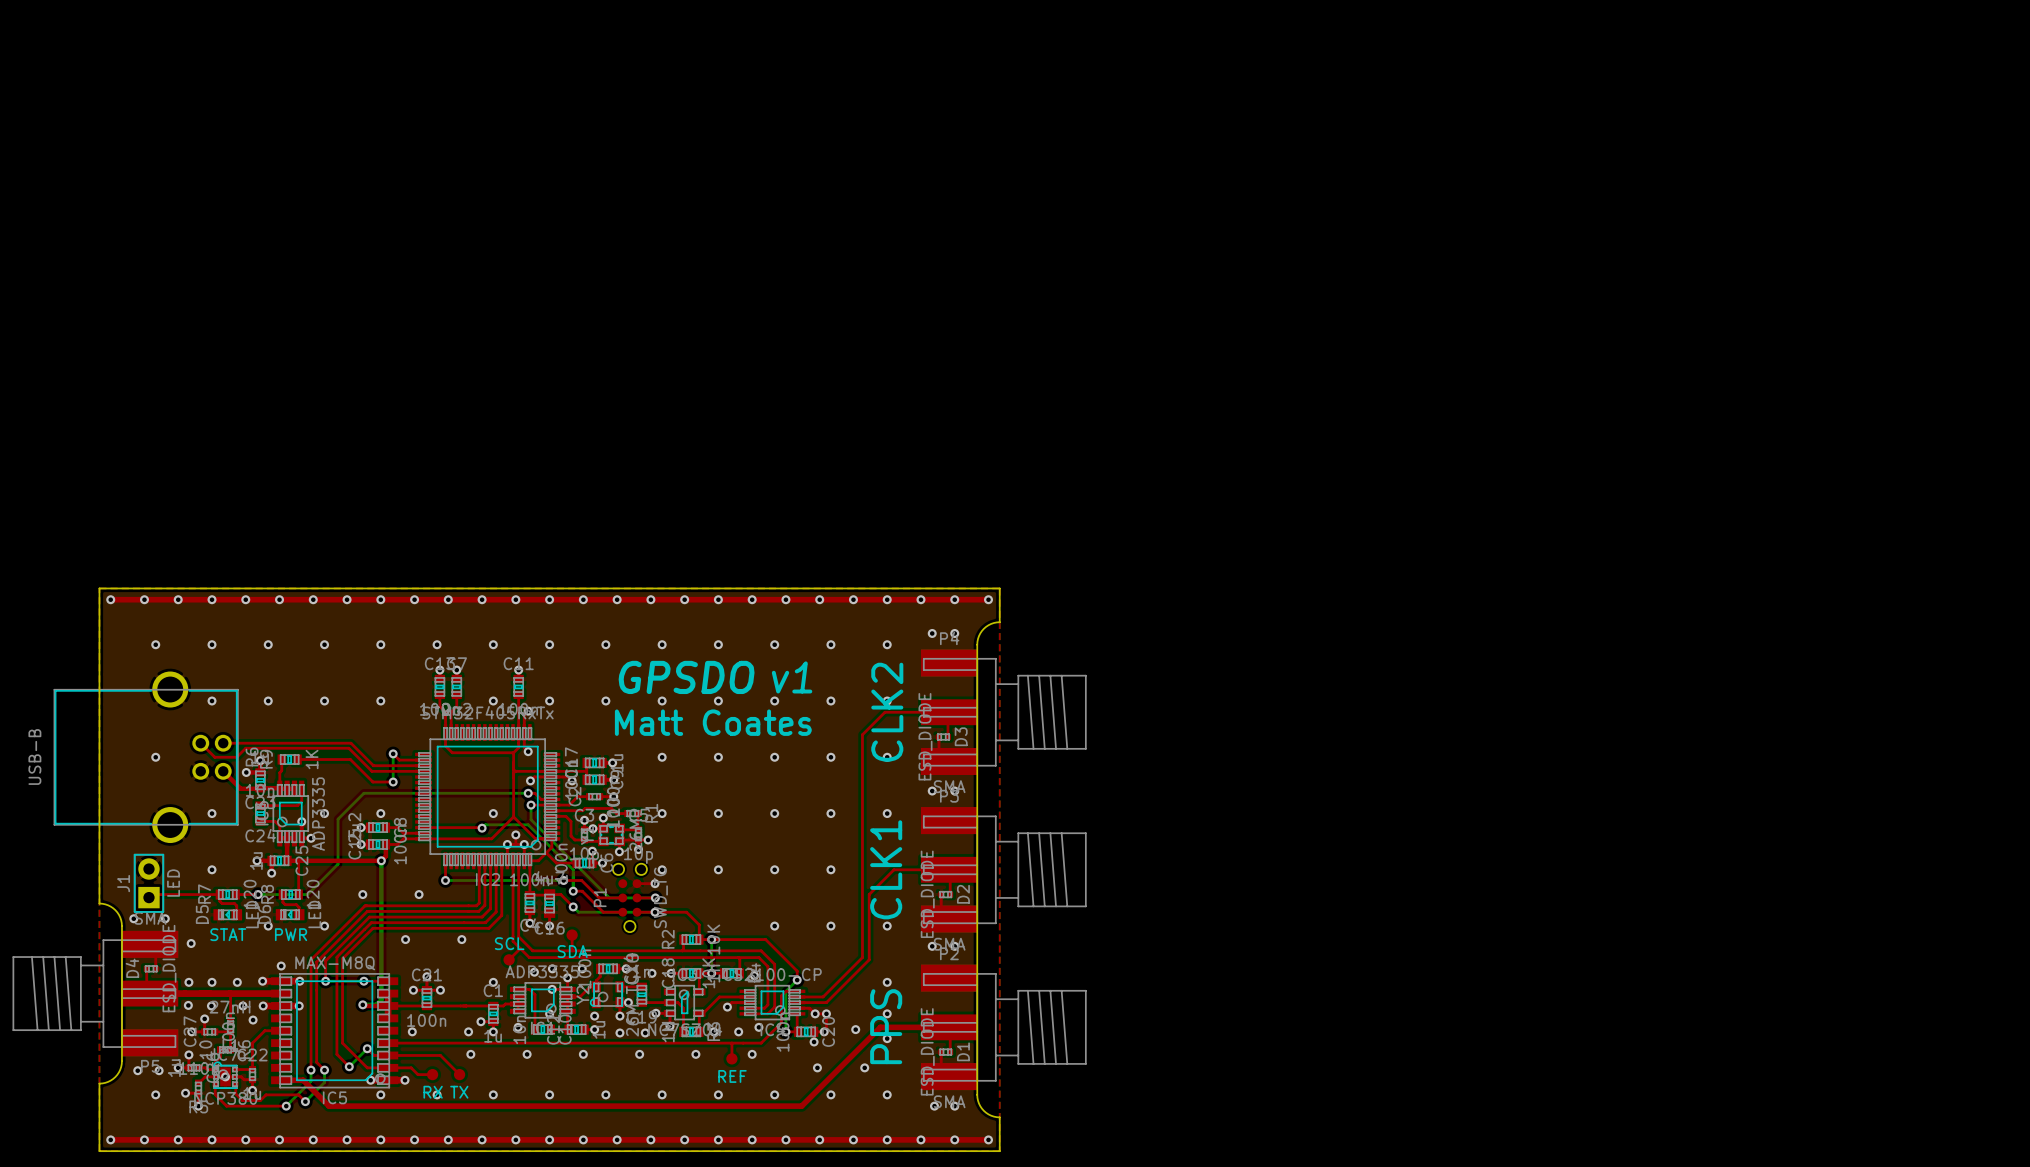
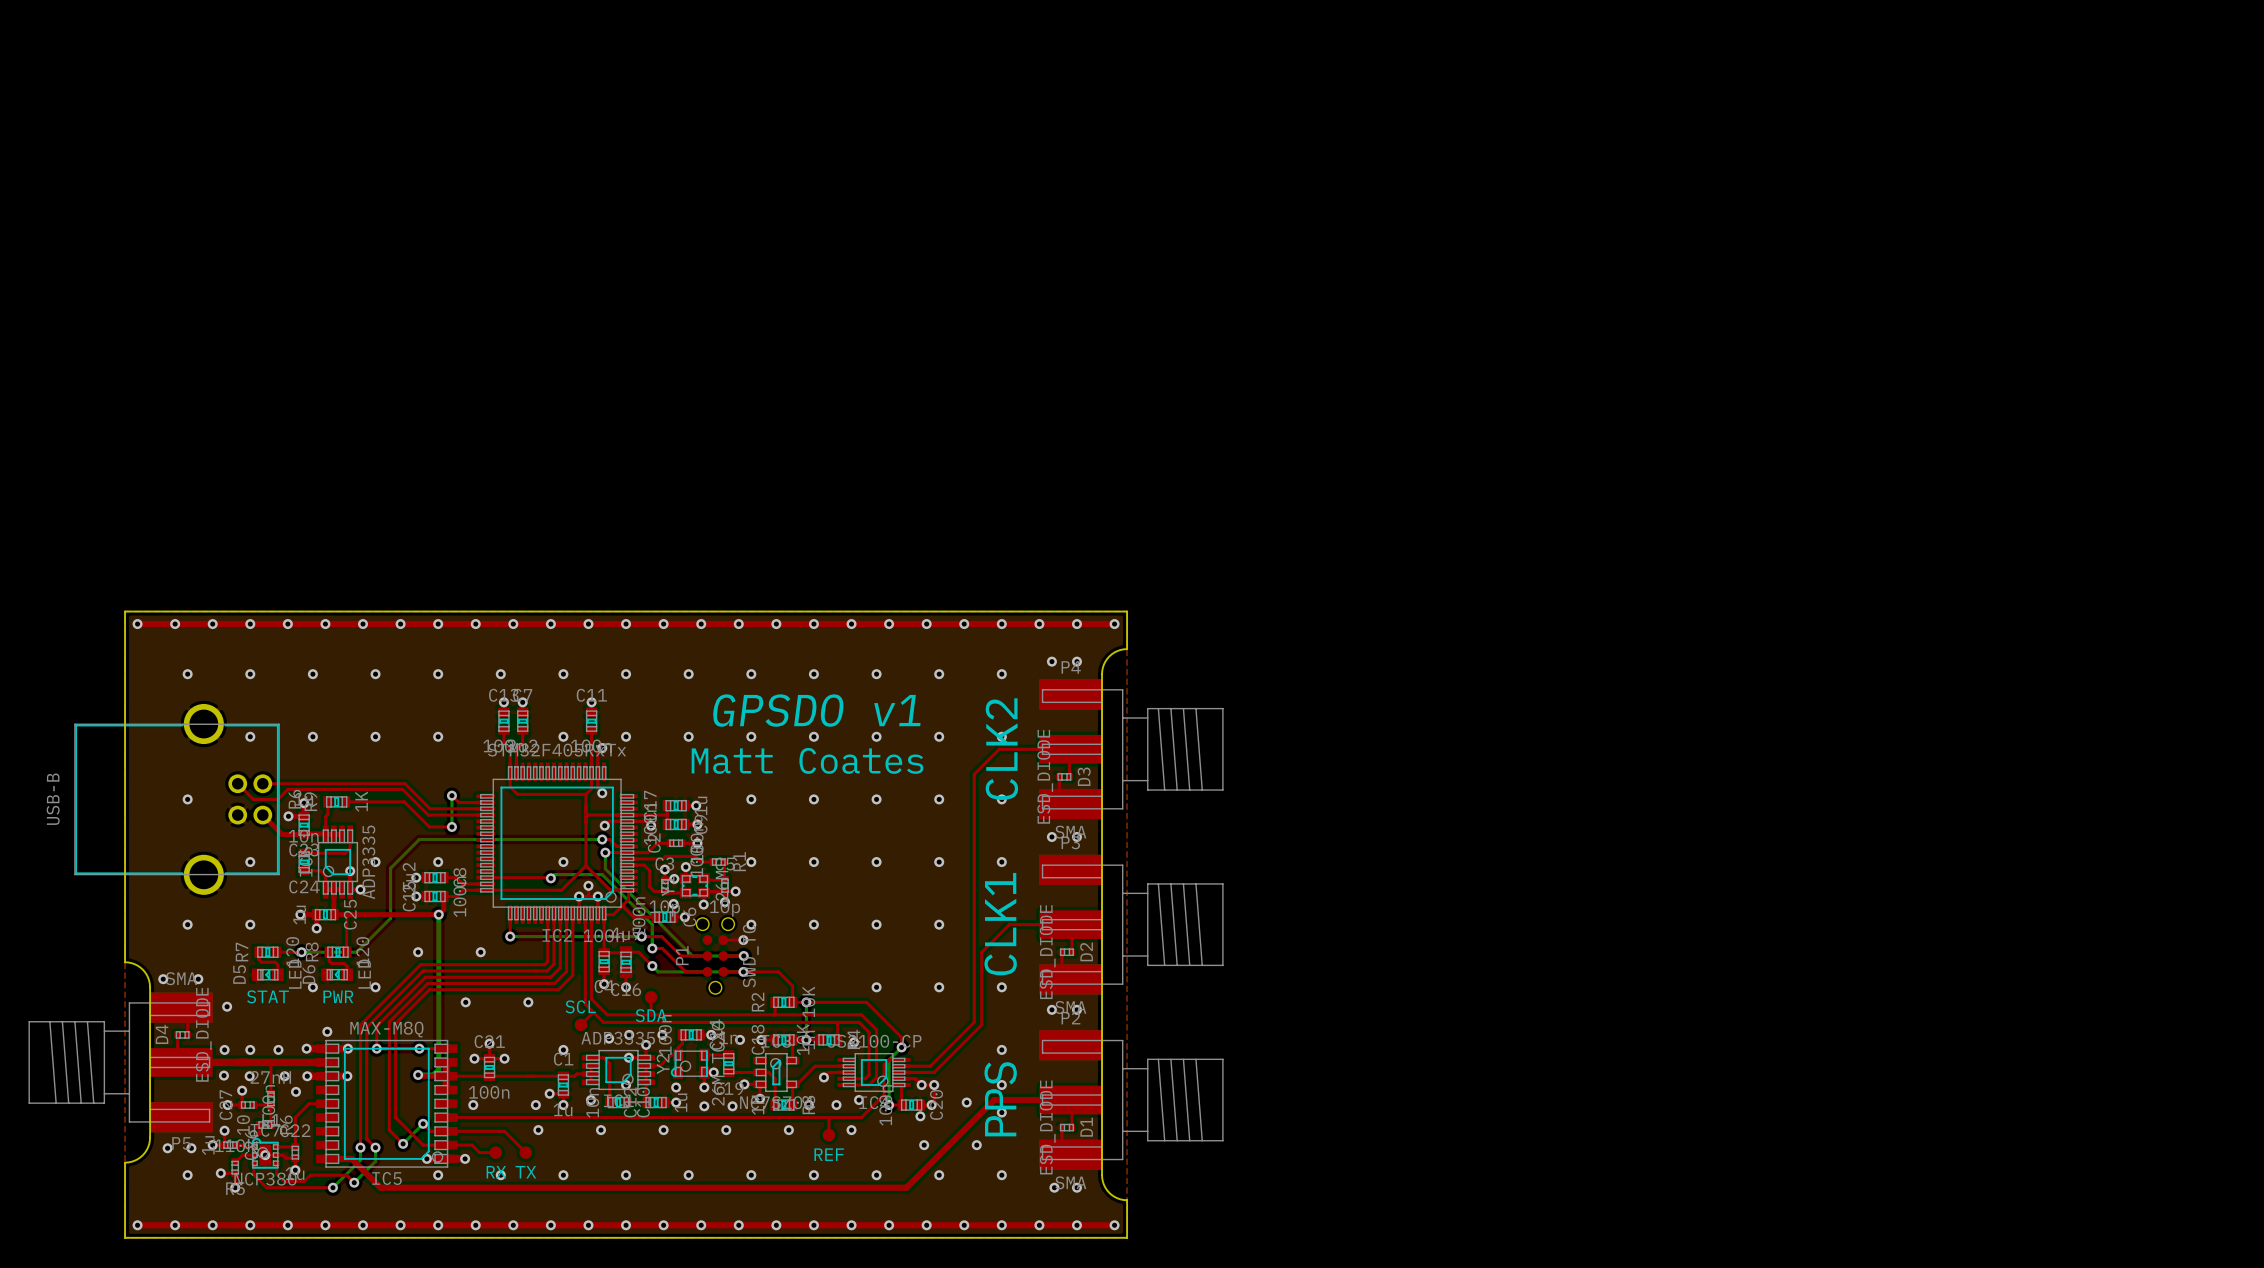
via: none -> (187, 924)
J1: LED (148, 883) -> none
top track: (219, 894) (152, 894) (148, 897) -> none

